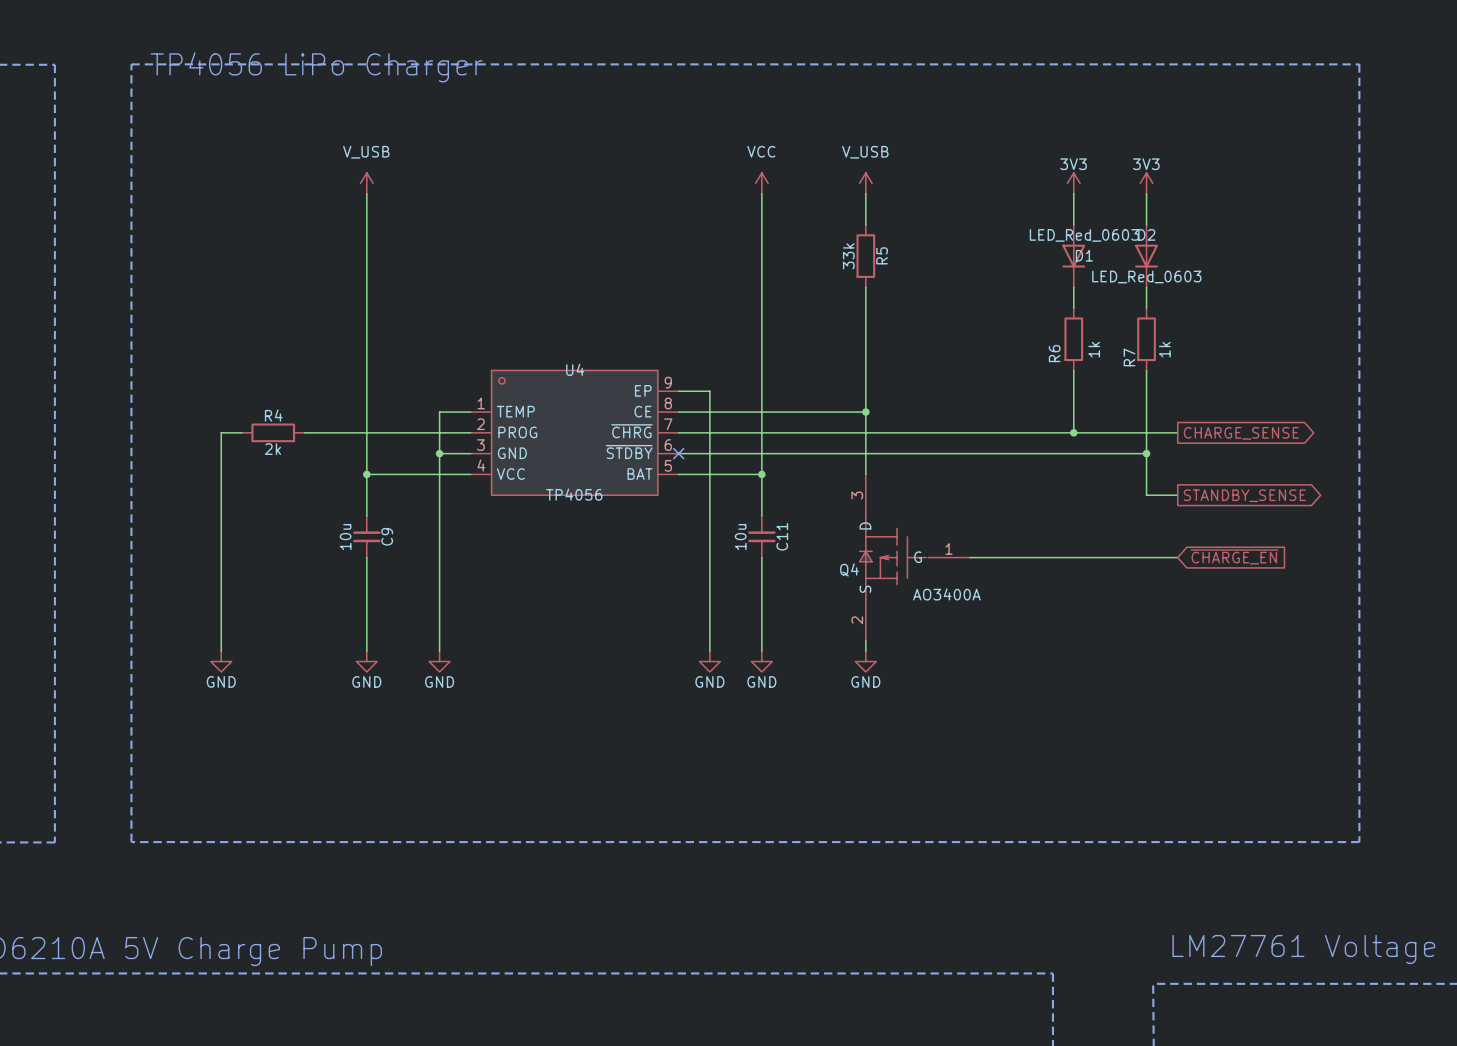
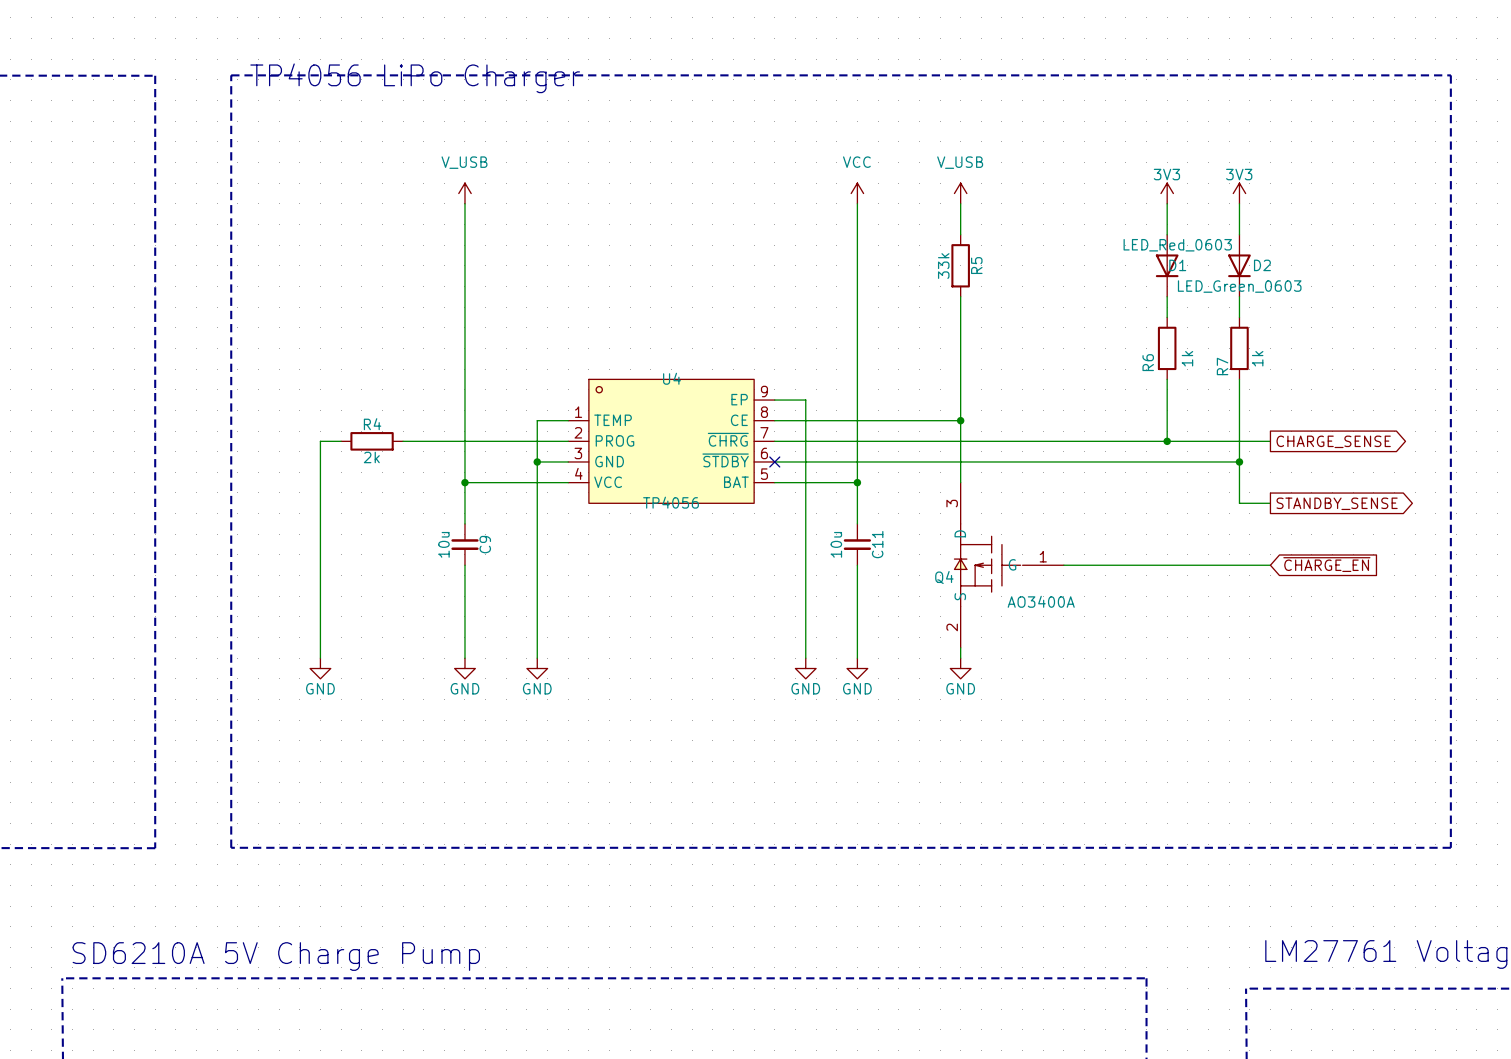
D2 name position: D2 (1146, 234) -> D2 (1262, 265)
D2 value: LED_Red_0603 (1146, 276) -> LED_Green_0603 (1239, 286)

